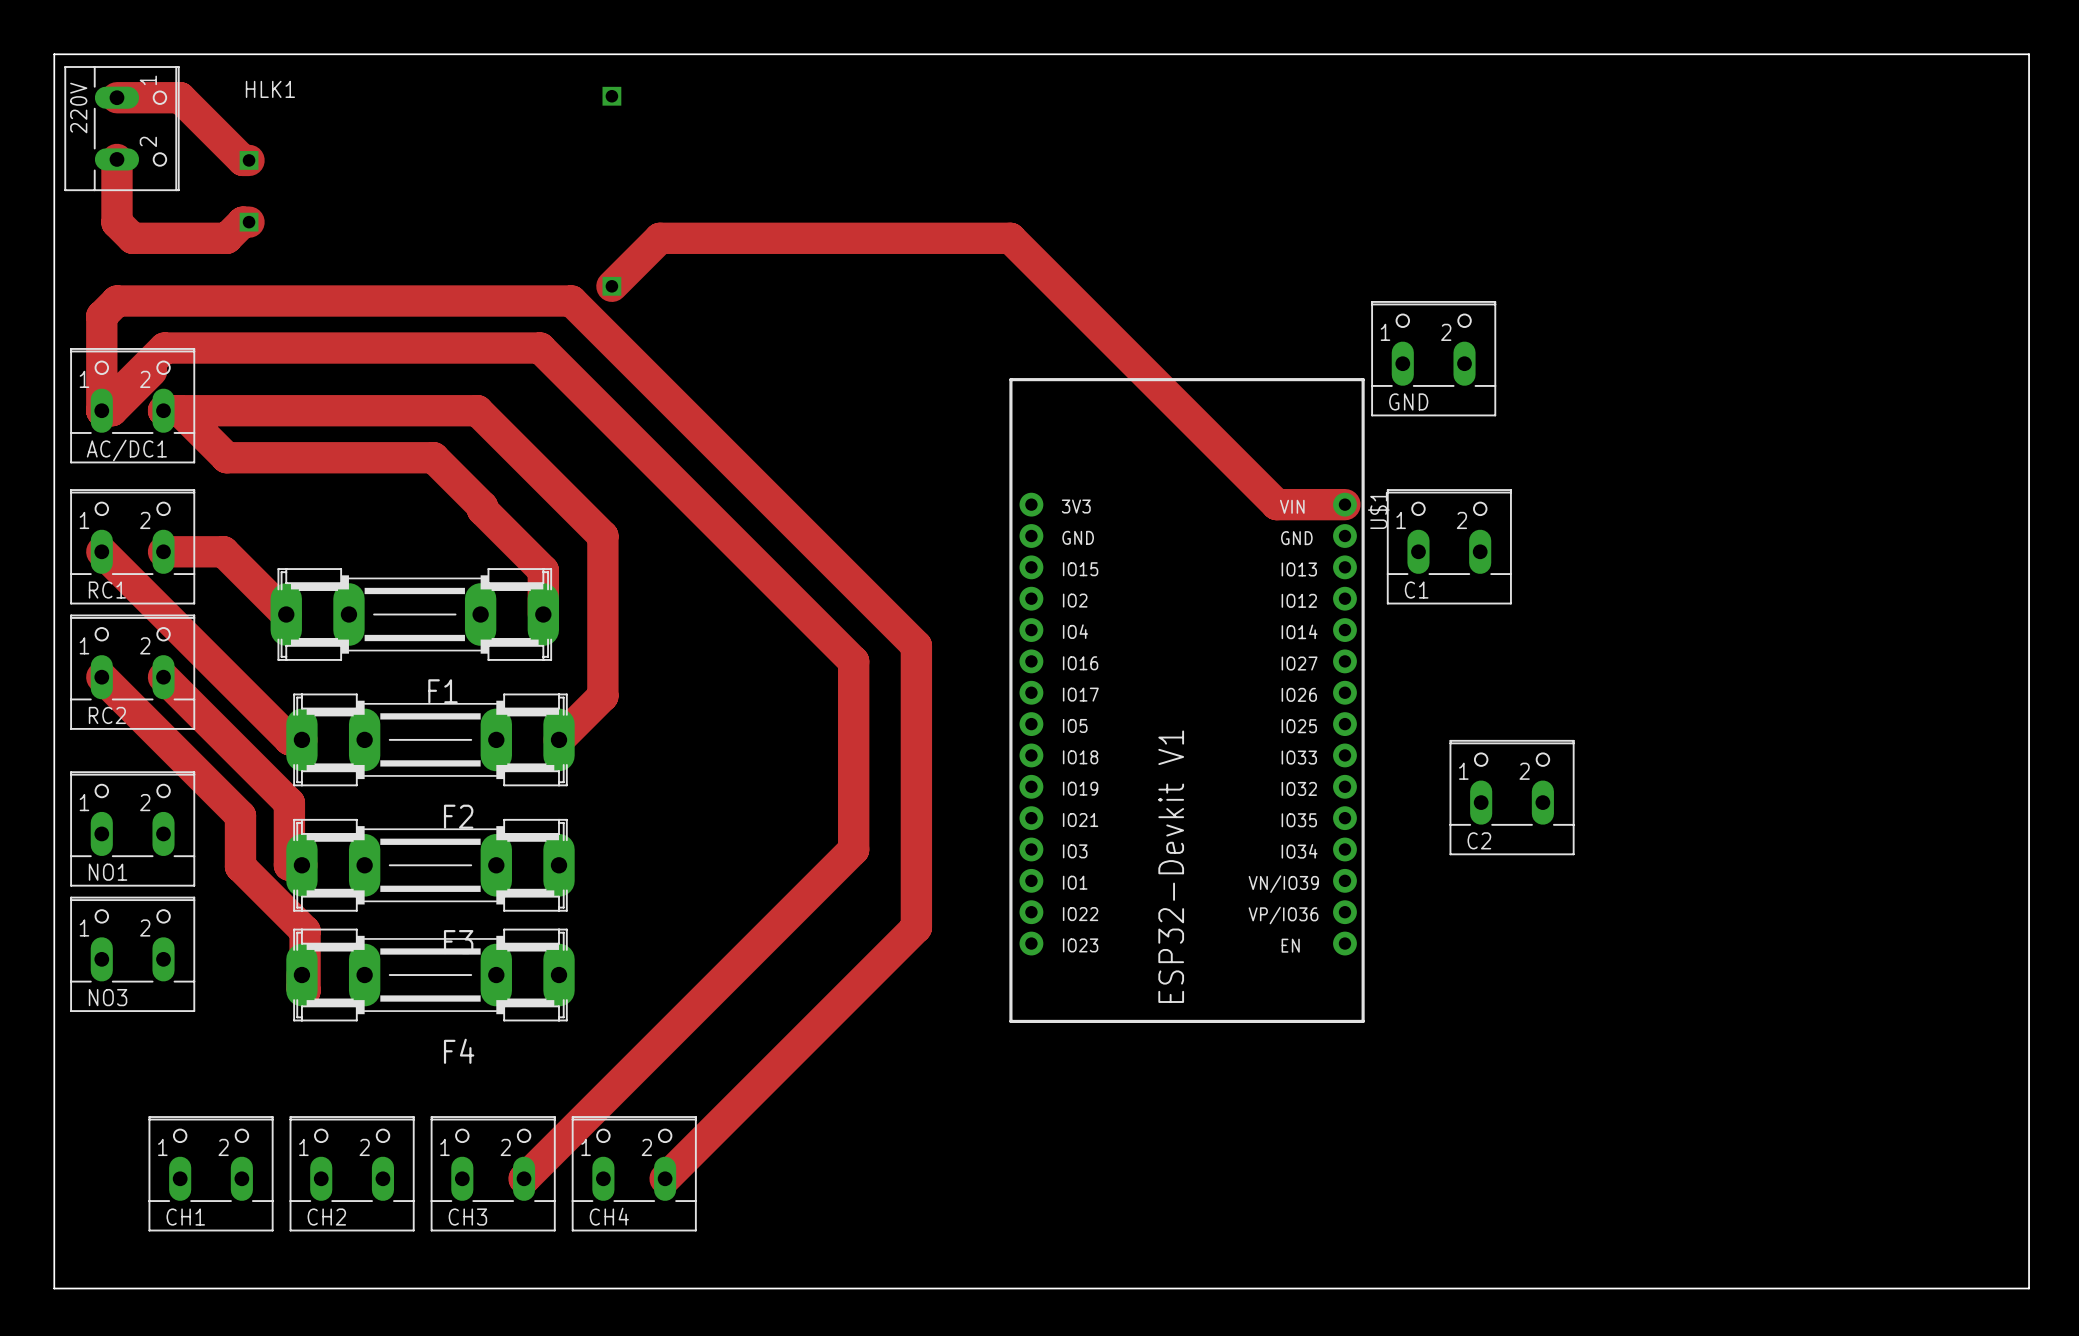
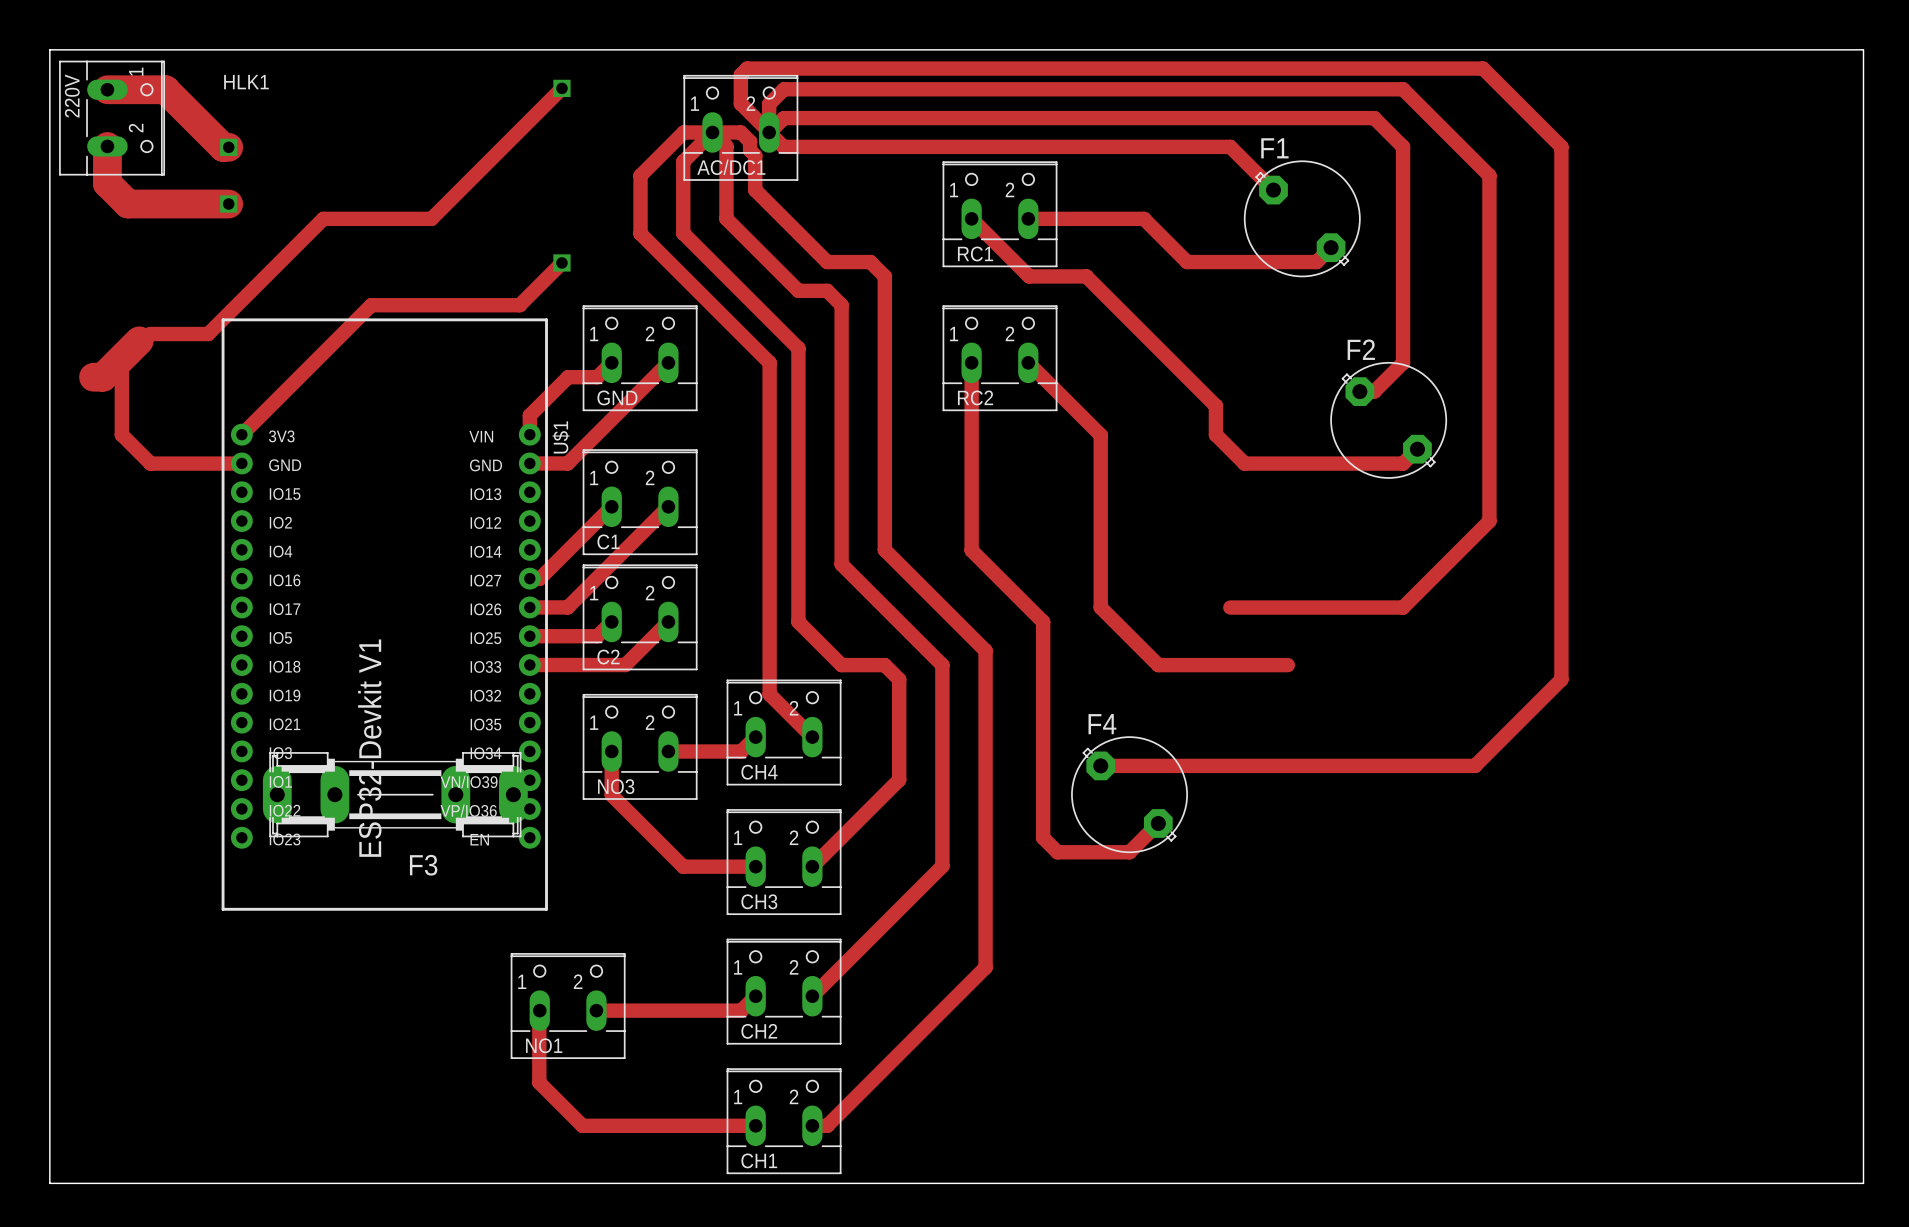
track: none -> (561, 88) (431, 218) (323, 218) (208, 334) (150, 334) (121, 362) (121, 434) (150, 463) (241, 463)
track: none -> (769, 132) (740, 103) (740, 74) (747, 68) (1483, 68) (1561, 146) (1561, 679) (1475, 765) (1100, 765)
track: none -> (769, 132) (784, 118) (1374, 118) (1403, 146) (1403, 362) (1374, 391) (1359, 391)
track: none -> (769, 132) (783, 146) (1230, 146) (1273, 190)
track: none -> (769, 132) (769, 104) (784, 89) (1403, 89) (1489, 175) (1489, 521) (1403, 607) (1230, 607)
track: (116, 199) (116, 222) (132, 238) (226, 238) (242, 222) -> (107, 183) (127, 204) (223, 204)
track: none -> (971, 218) (1029, 276) (1086, 276) (1215, 406) (1215, 434) (1244, 463) (1403, 463) (1417, 449)
track: none -> (1028, 218) (1143, 218) (1187, 262) (1316, 262) (1331, 247)
track: (611, 286) (659, 238) (1010, 238) (1276, 504) (1344, 504) -> (561, 262) (519, 305) (371, 305) (241, 434)
GND: (1433, 358) -> none
GND: none -> (640, 358)
track: none -> (611, 362) (597, 377) (568, 377) (529, 415) (529, 434)
track: none -> (668, 362) (567, 463) (529, 463)
track: none -> (971, 362) (971, 550) (1043, 621) (1043, 837) (1057, 852) (1129, 852) (1158, 823)
track: none -> (1028, 362) (1100, 435) (1100, 607) (1158, 665) (1287, 665)
AC/DC1 position: (132, 405) -> (740, 127)
track: (163, 410) (477, 410) (602, 536) (602, 696) (559, 739) -> none
track: (179, 410) (226, 457) (433, 457) (543, 570) (543, 614) -> none
RC1 position: (132, 546) -> (999, 214)
C1 position: (1449, 546) -> (640, 502)
track: (101, 551) (289, 739) (301, 739) -> none
track: (163, 551) (223, 551) (286, 614) -> none
track: none -> (611, 506) (539, 578) (529, 578)
track: none -> (668, 506) (567, 607) (529, 607)
F1 footprint: [270, 568, 560, 661] -> [1243, 160, 1361, 278]
RC2 position: (132, 672) -> (999, 358)
track: (101, 677) (240, 815) (240, 866) (305, 931) (305, 990) (301, 987) (301, 975) -> none
track: (163, 677) (289, 803) (289, 865) (301, 865) -> none
track: none -> (611, 621) (597, 636) (529, 636)
track: none -> (668, 621) (625, 665) (529, 665)
F1 name position: F1 (442, 691) -> F1 (1274, 148)
F2 footprint: [286, 693, 575, 787] -> [1330, 361, 1448, 479]
U$1 position: (1187, 700) -> (384, 614)
C2 position: (1512, 797) -> (640, 617)
track: none -> (755, 737) (741, 751) (668, 751)
track: none -> (812, 737) (769, 694) (769, 362) (640, 233) (640, 175) (683, 132) (740, 132) (750, 141) (750, 150) (755, 155) (755, 190) (827, 262) (870, 262) (884, 276) (884, 549) (985, 650) (985, 967) (827, 1125) (812, 1125)
F2 name position: F2 (458, 816) -> F2 (1361, 349)
track: none -> (611, 751) (611, 795) (683, 866) (755, 866)
NO1 position: (132, 828) -> (568, 1006)
F4 footprint: [286, 928, 575, 1022] -> [1071, 736, 1188, 854]
track: none -> (812, 866) (899, 779) (899, 679) (884, 665) (841, 665) (798, 621) (798, 348) (683, 233) (683, 161) (712, 132) (726, 146) (726, 218) (798, 290) (827, 290) (841, 305) (841, 564) (942, 665) (942, 866) (812, 996)
NO3 position: (132, 954) -> (640, 746)
F4 name position: F4 (459, 1051) -> F4 (1102, 724)
track: none -> (755, 996) (741, 1010) (596, 1010)
track: none -> (539, 1010) (539, 1082) (582, 1125) (755, 1125)
CH1 position: (211, 1173) -> (784, 1121)
CH2 position: (352, 1173) -> (784, 991)
CH3 position: (493, 1173) -> (784, 862)
CH4 position: (634, 1173) -> (784, 732)
track: (524, 1178) (853, 849) (853, 661) (540, 348) (164, 348) (101, 410) (101, 316) (116, 301) (571, 301) (916, 645) (916, 927) (665, 1178) -> none

